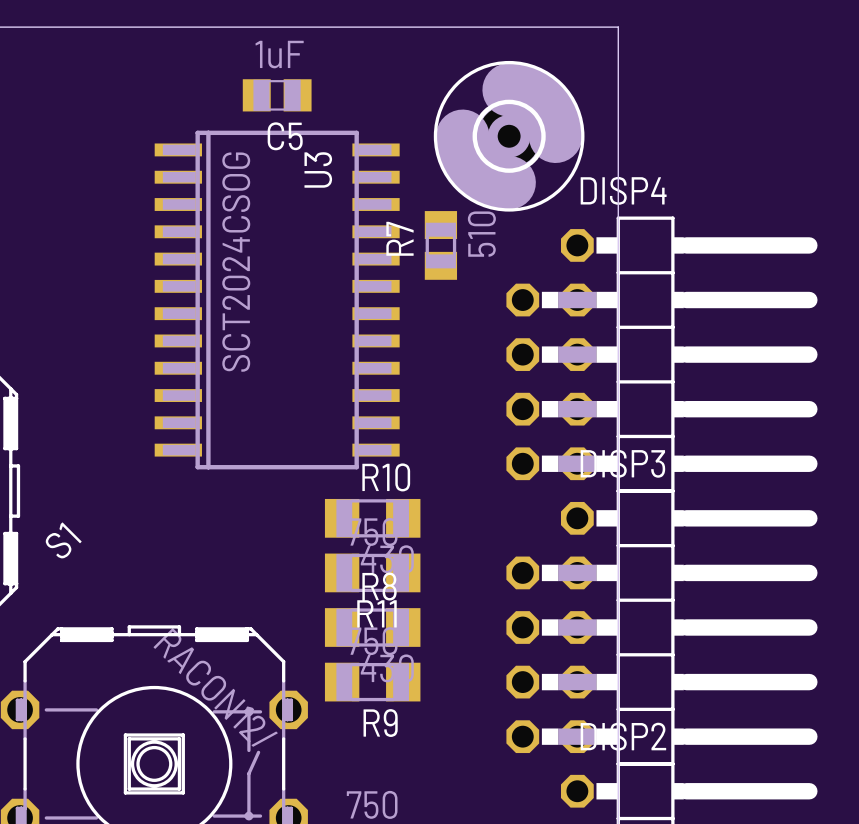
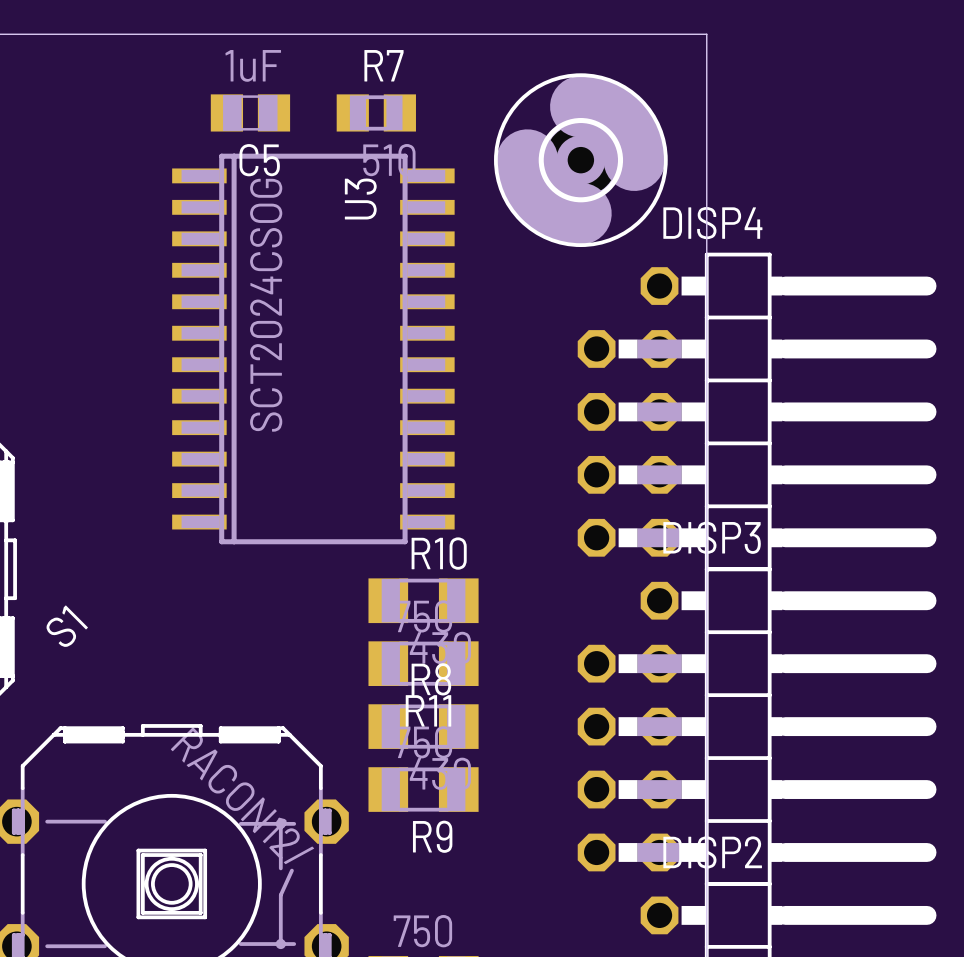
C5 position: (277, 95) -> (250, 112)
R7 rotation: 0° (440, 245) -> 90° clockwise (376, 112)
R7 position: (440, 245) -> (376, 112)

